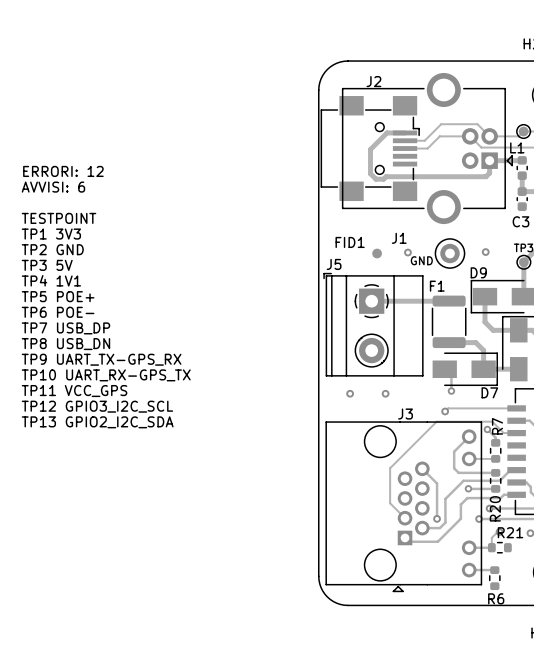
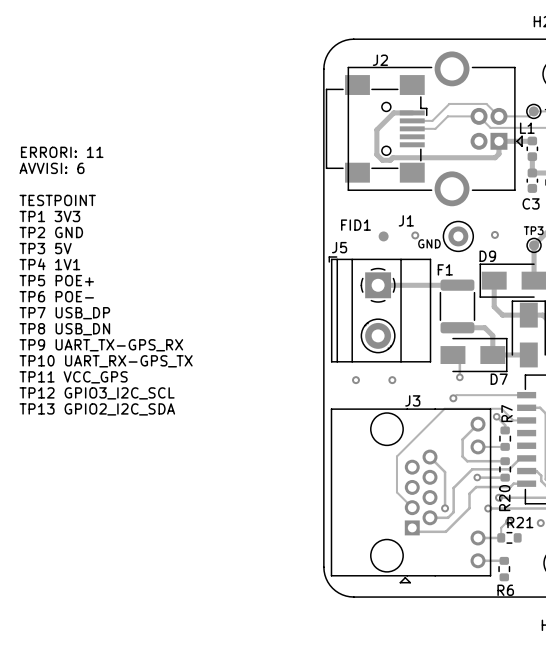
text: ERRORI: 12 (63, 171) -> ERRORI: 11 (62, 152)

